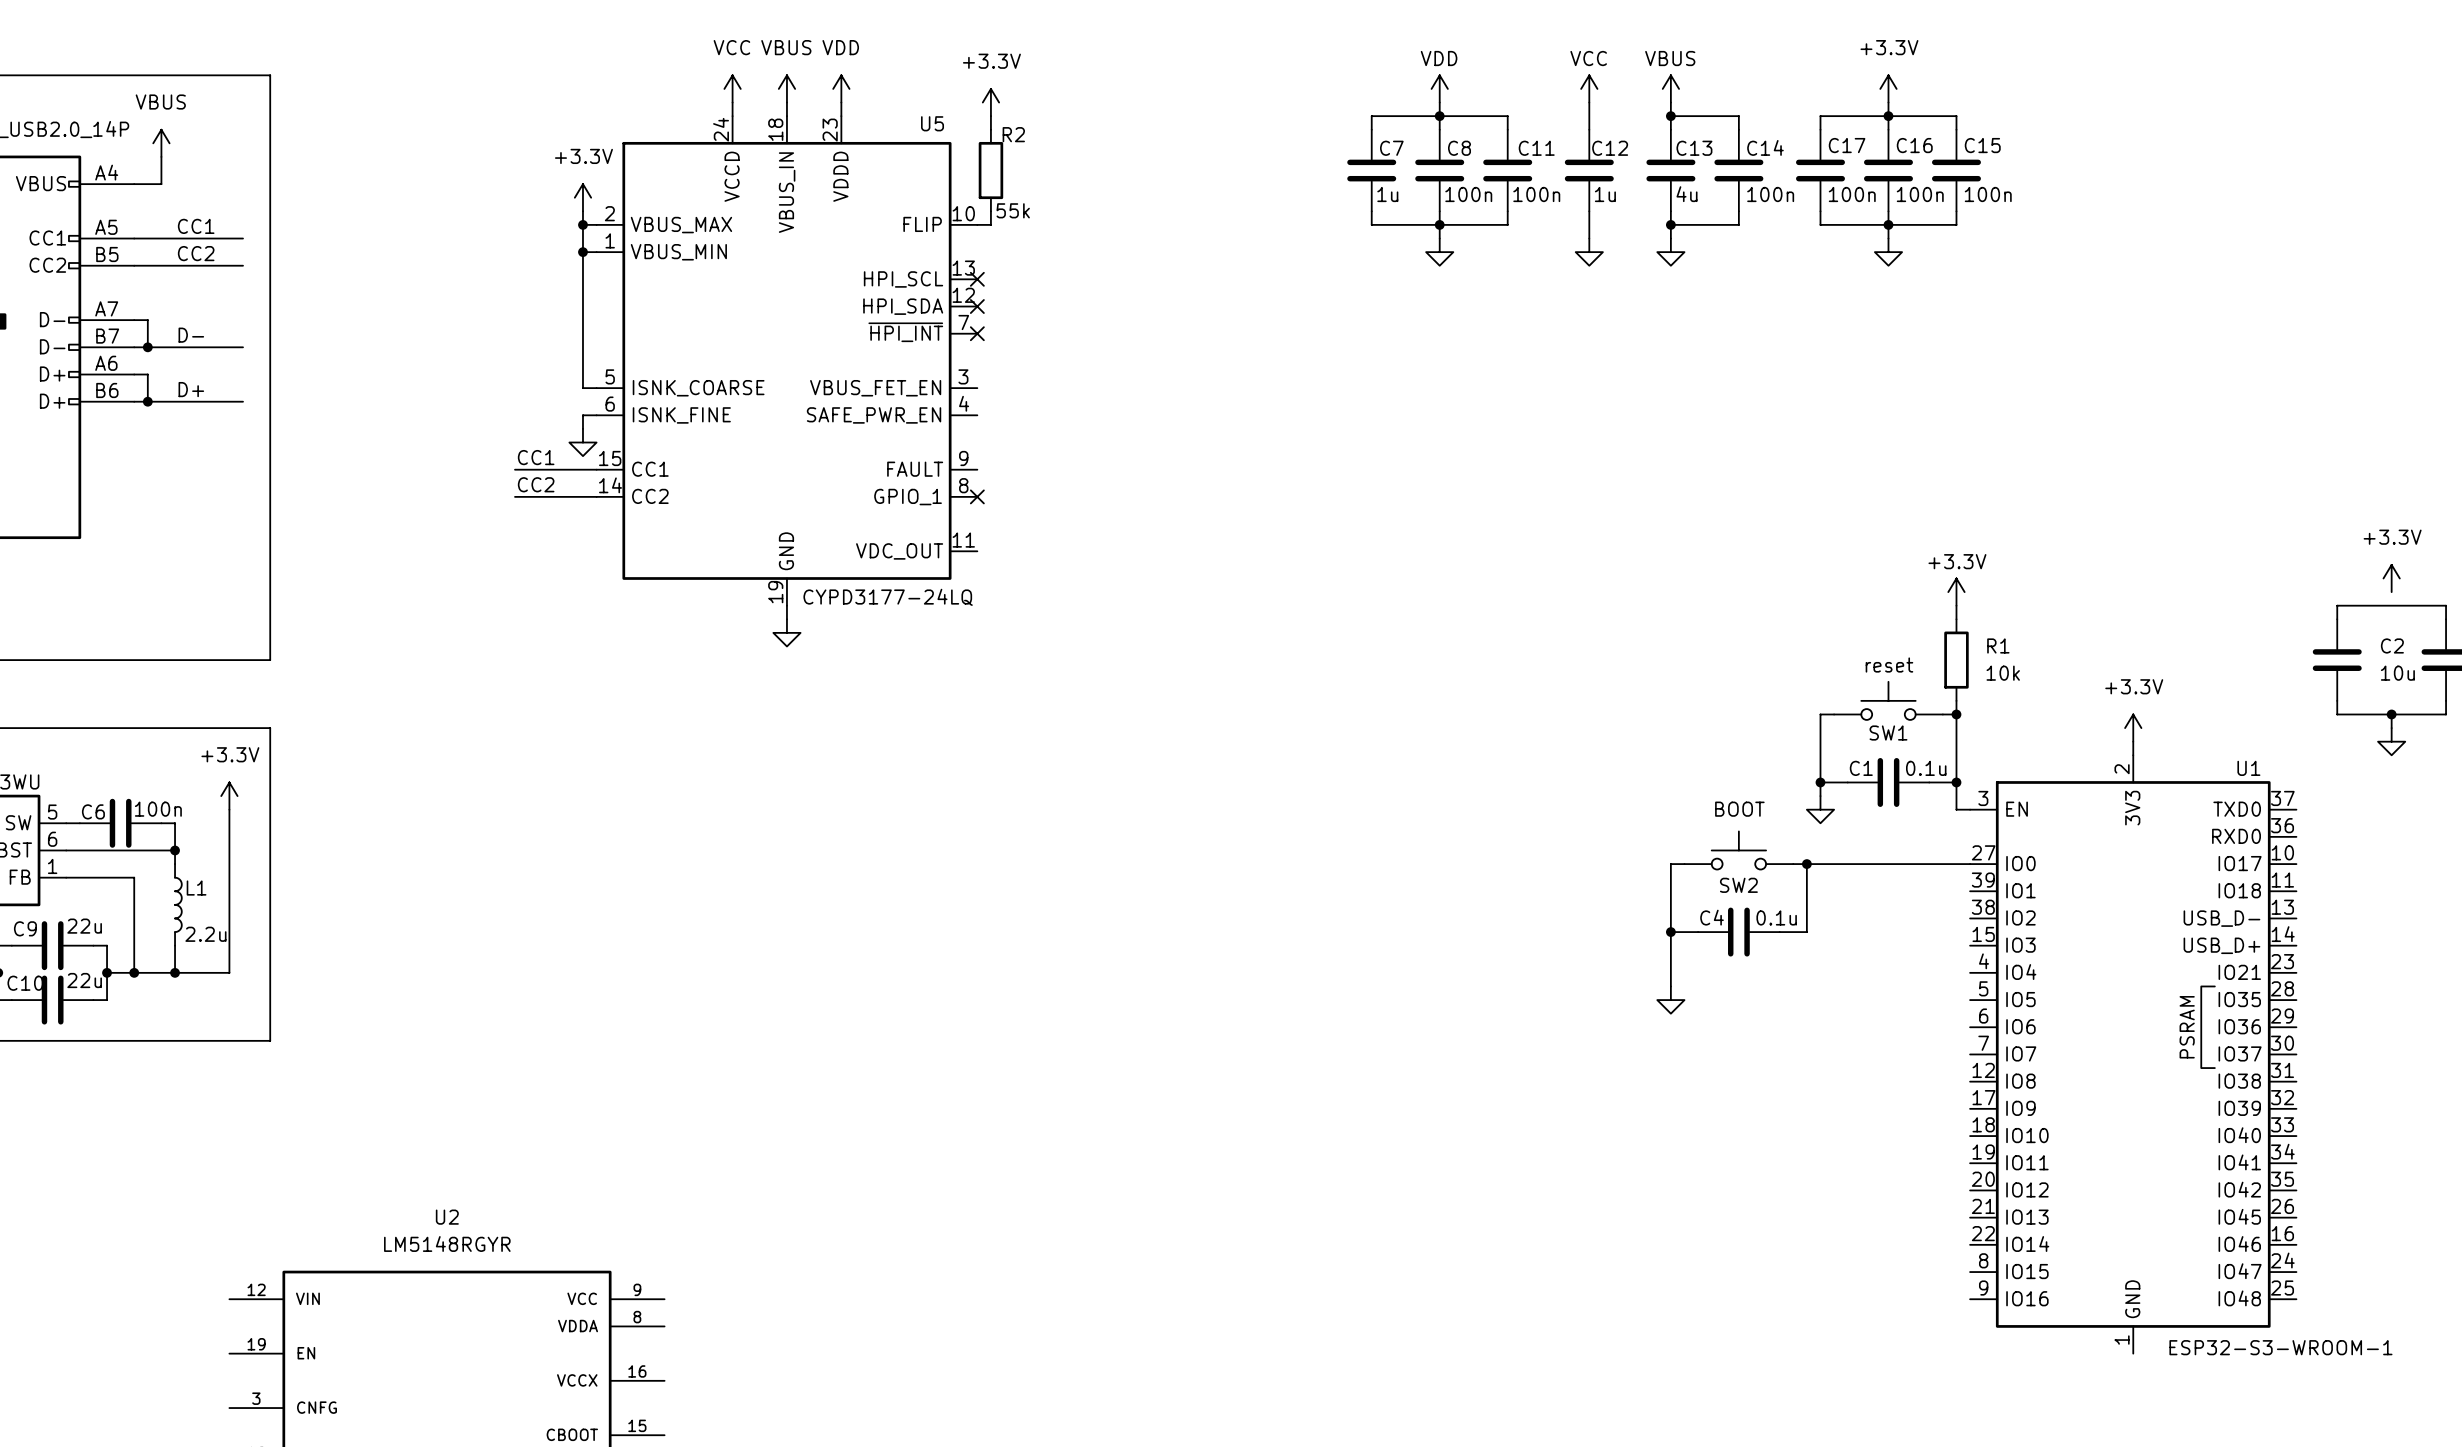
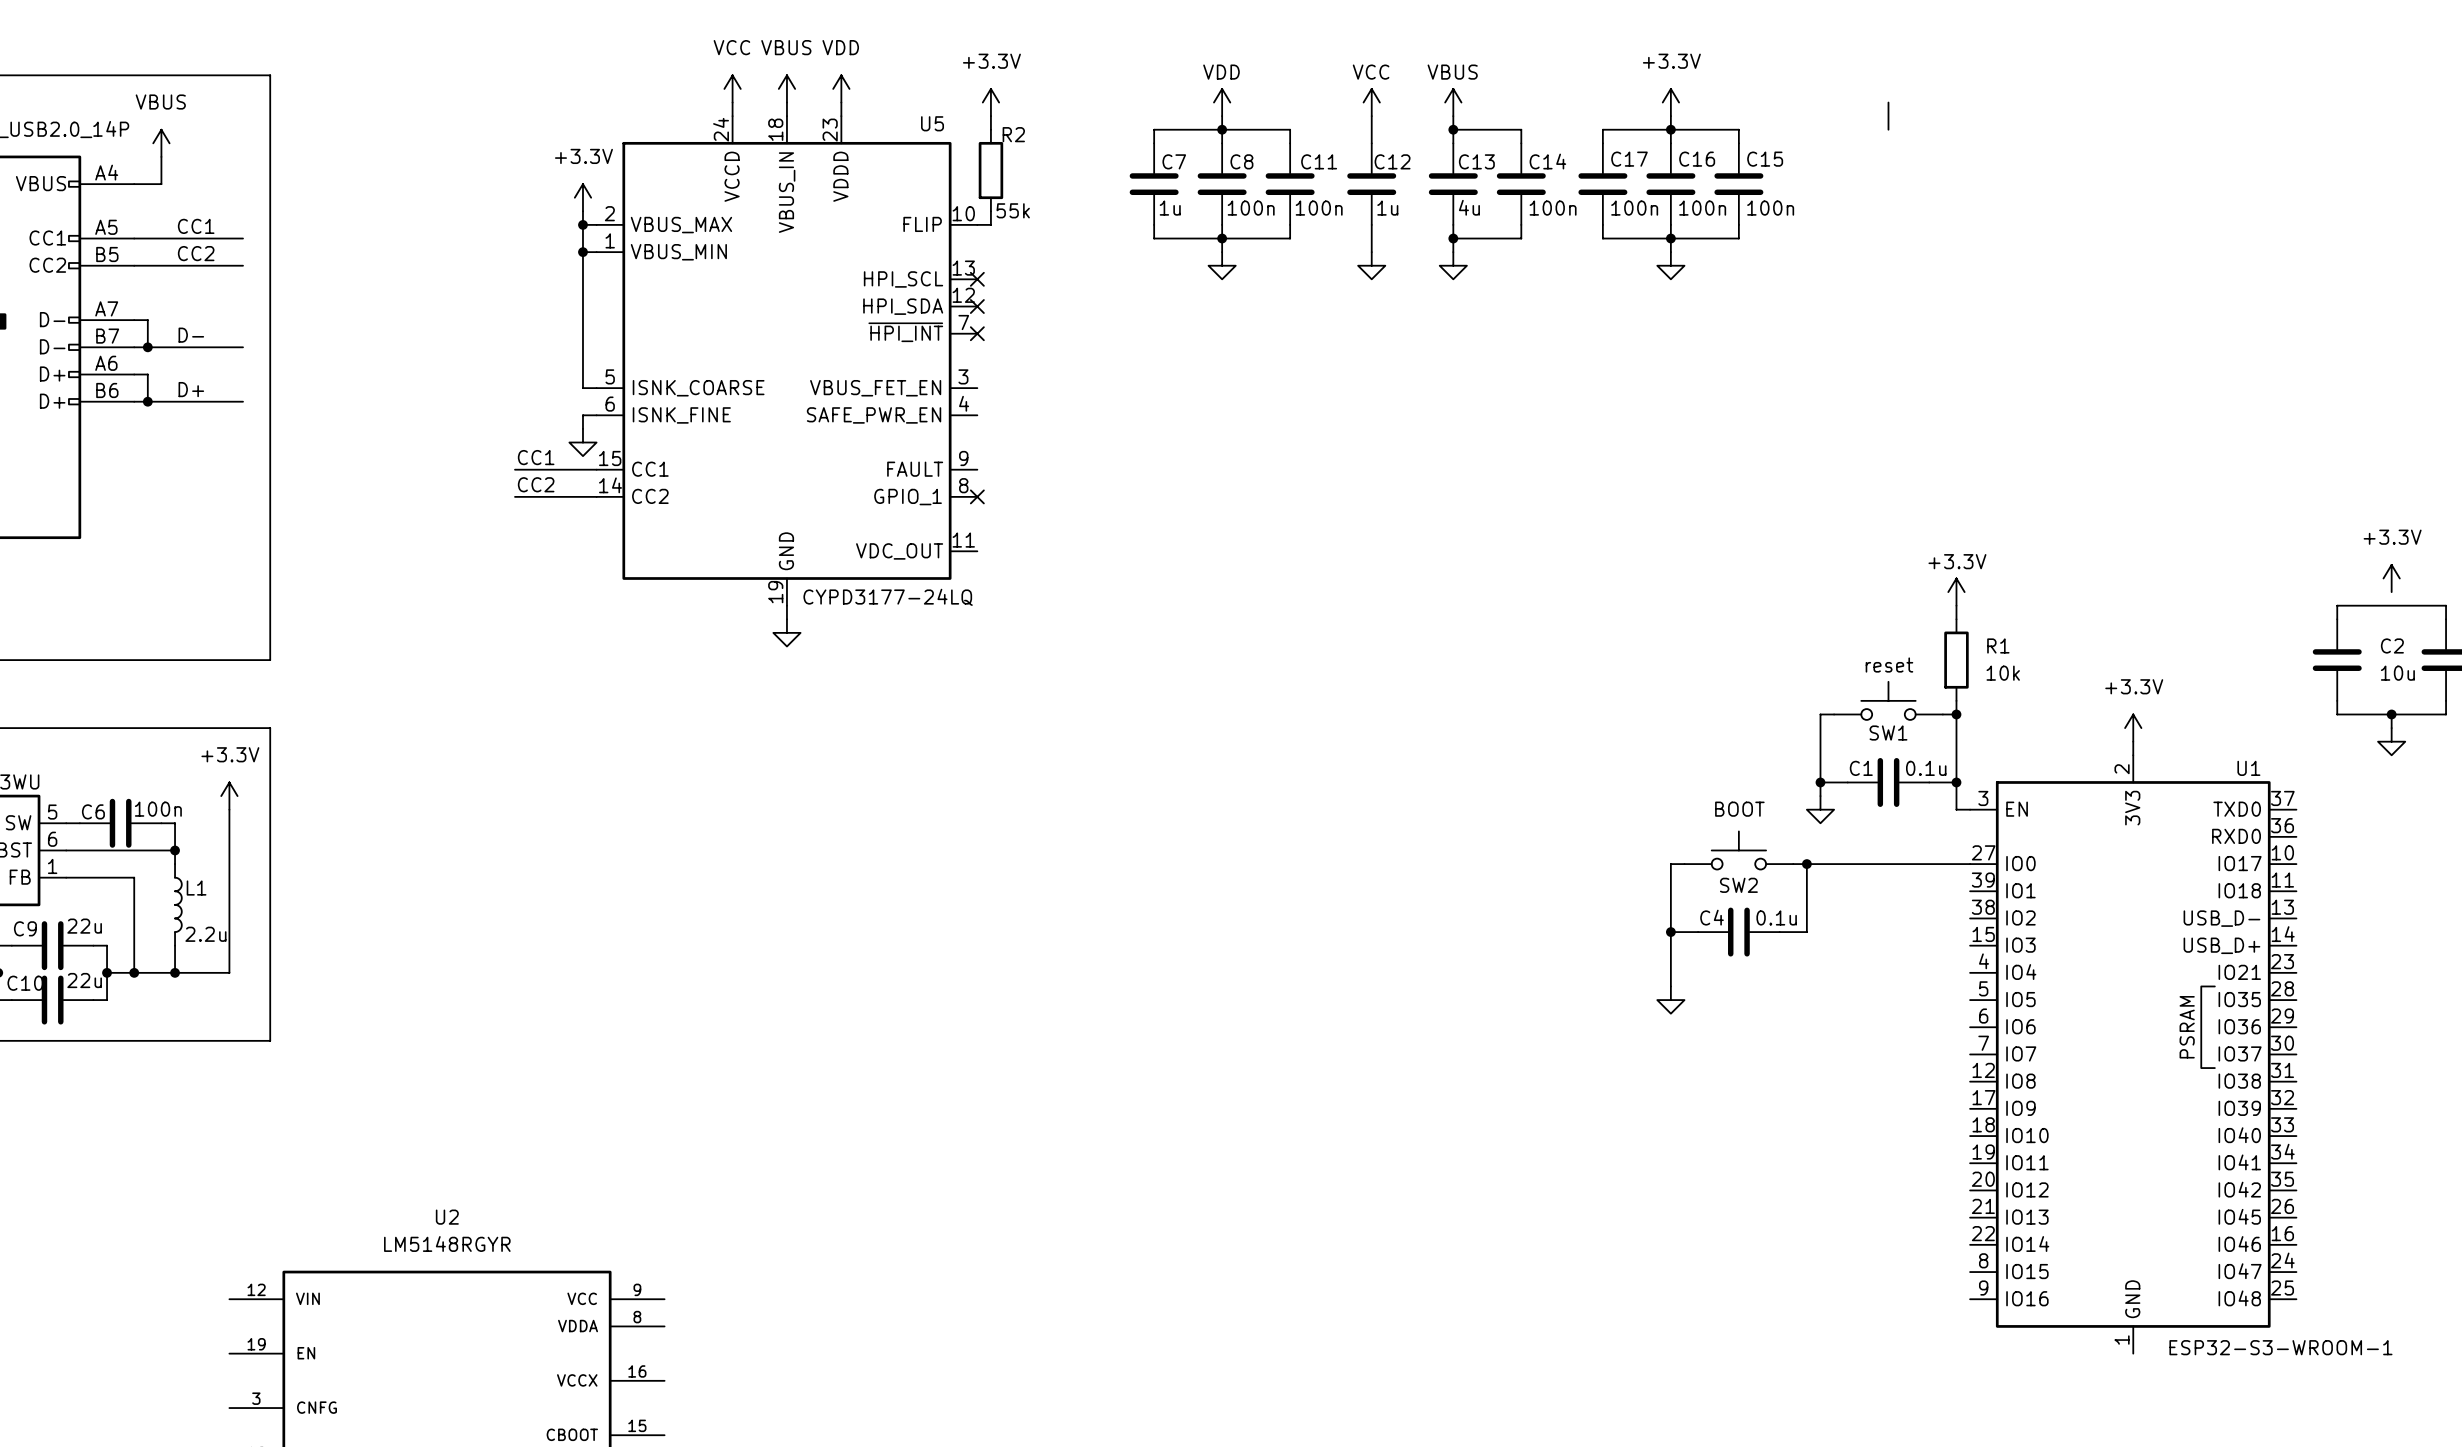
power symbol position: VDD (1439, 88) -> VDD (1222, 102)
power symbol position: VCC (1589, 88) -> VCC (1371, 102)
power symbol position: VBUS (1670, 88) -> VBUS (1453, 102)
power symbol position: +3.3V (1888, 88) -> +3.3V (1670, 102)
wire: (1439, 102) (1439, 129) -> (1222, 116) (1222, 143)
wire: (1589, 102) (1589, 129) -> (1453, 116) (1453, 143)
wire: (1670, 102) (1670, 116) (1738, 116) (1738, 129) -> none
wire: (1371, 116) (1507, 116) (1507, 129) -> none
junction position: (1439, 116) -> (1453, 129)
junction position: (1670, 116) -> (1670, 129)
junction: (1888, 116) -> none
junction: none -> (1222, 129)
wire: none -> (1453, 129) (1521, 129) (1521, 143)
wire: (1820, 129) (1820, 116) (1956, 116) (1956, 129) -> (1602, 143) (1602, 129) (1738, 129) (1738, 143)
wire: none -> (1154, 143) (1154, 129) (1290, 129) (1290, 143)
C7 position: (1371, 170) -> (1154, 184)
C8 position: (1439, 170) -> (1222, 184)
C11 position: (1507, 170) -> (1290, 184)
C12 position: (1589, 170) -> (1371, 184)
C13 position: (1670, 170) -> (1453, 184)
C14 position: (1738, 170) -> (1521, 184)
C17 position: (1820, 170) -> (1602, 184)
C16 position: (1888, 170) -> (1670, 184)
C15 position: (1956, 170) -> (1738, 184)
wire: (1371, 211) (1371, 224) (1507, 224) (1507, 211) -> (1154, 224) (1154, 238) (1290, 238) (1290, 224)
wire: (1439, 211) (1439, 238) -> (1222, 224) (1222, 252)
wire: (1589, 211) (1589, 238) -> (1371, 224) (1371, 252)
wire: (1670, 211) (1670, 224) (1738, 224) (1738, 211) -> none
wire: (1820, 211) (1820, 224) (1956, 224) (1956, 211) -> (1602, 224) (1602, 238) (1738, 238) (1738, 224)
wire: (1888, 211) (1888, 238) -> none
junction position: (1439, 224) -> (1453, 238)
wire: none -> (1453, 224) (1453, 252)
wire: none -> (1521, 224) (1521, 238) (1453, 238)
junction position: (1670, 224) -> (1670, 238)
junction: (1888, 224) -> none
junction: none -> (1222, 238)
power symbol position: (1439, 252) -> (1453, 265)
power symbol: (1589, 252) -> none
power symbol position: (1670, 252) -> (1670, 265)
power symbol: (1888, 252) -> none
power symbol: none -> (1222, 265)
power symbol: none -> (1371, 265)

